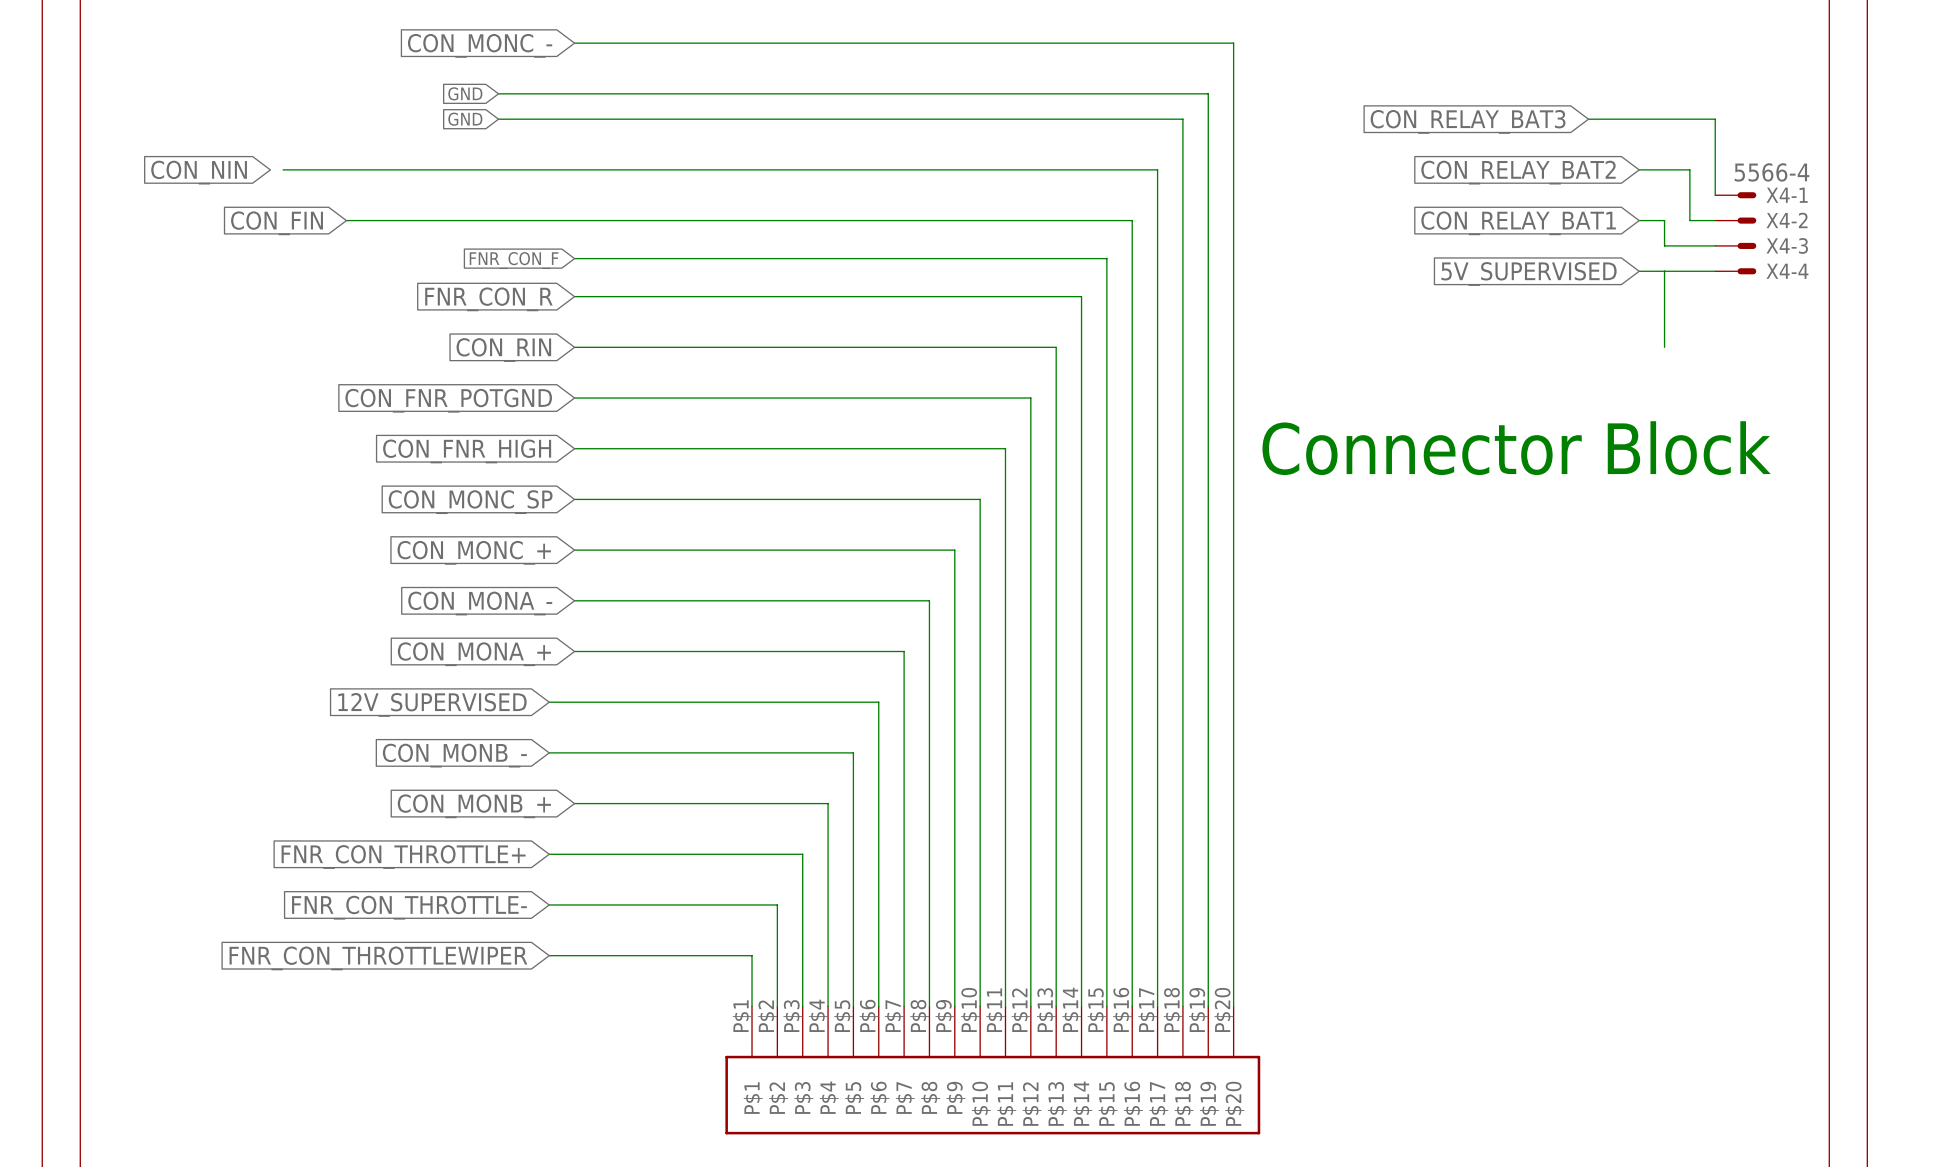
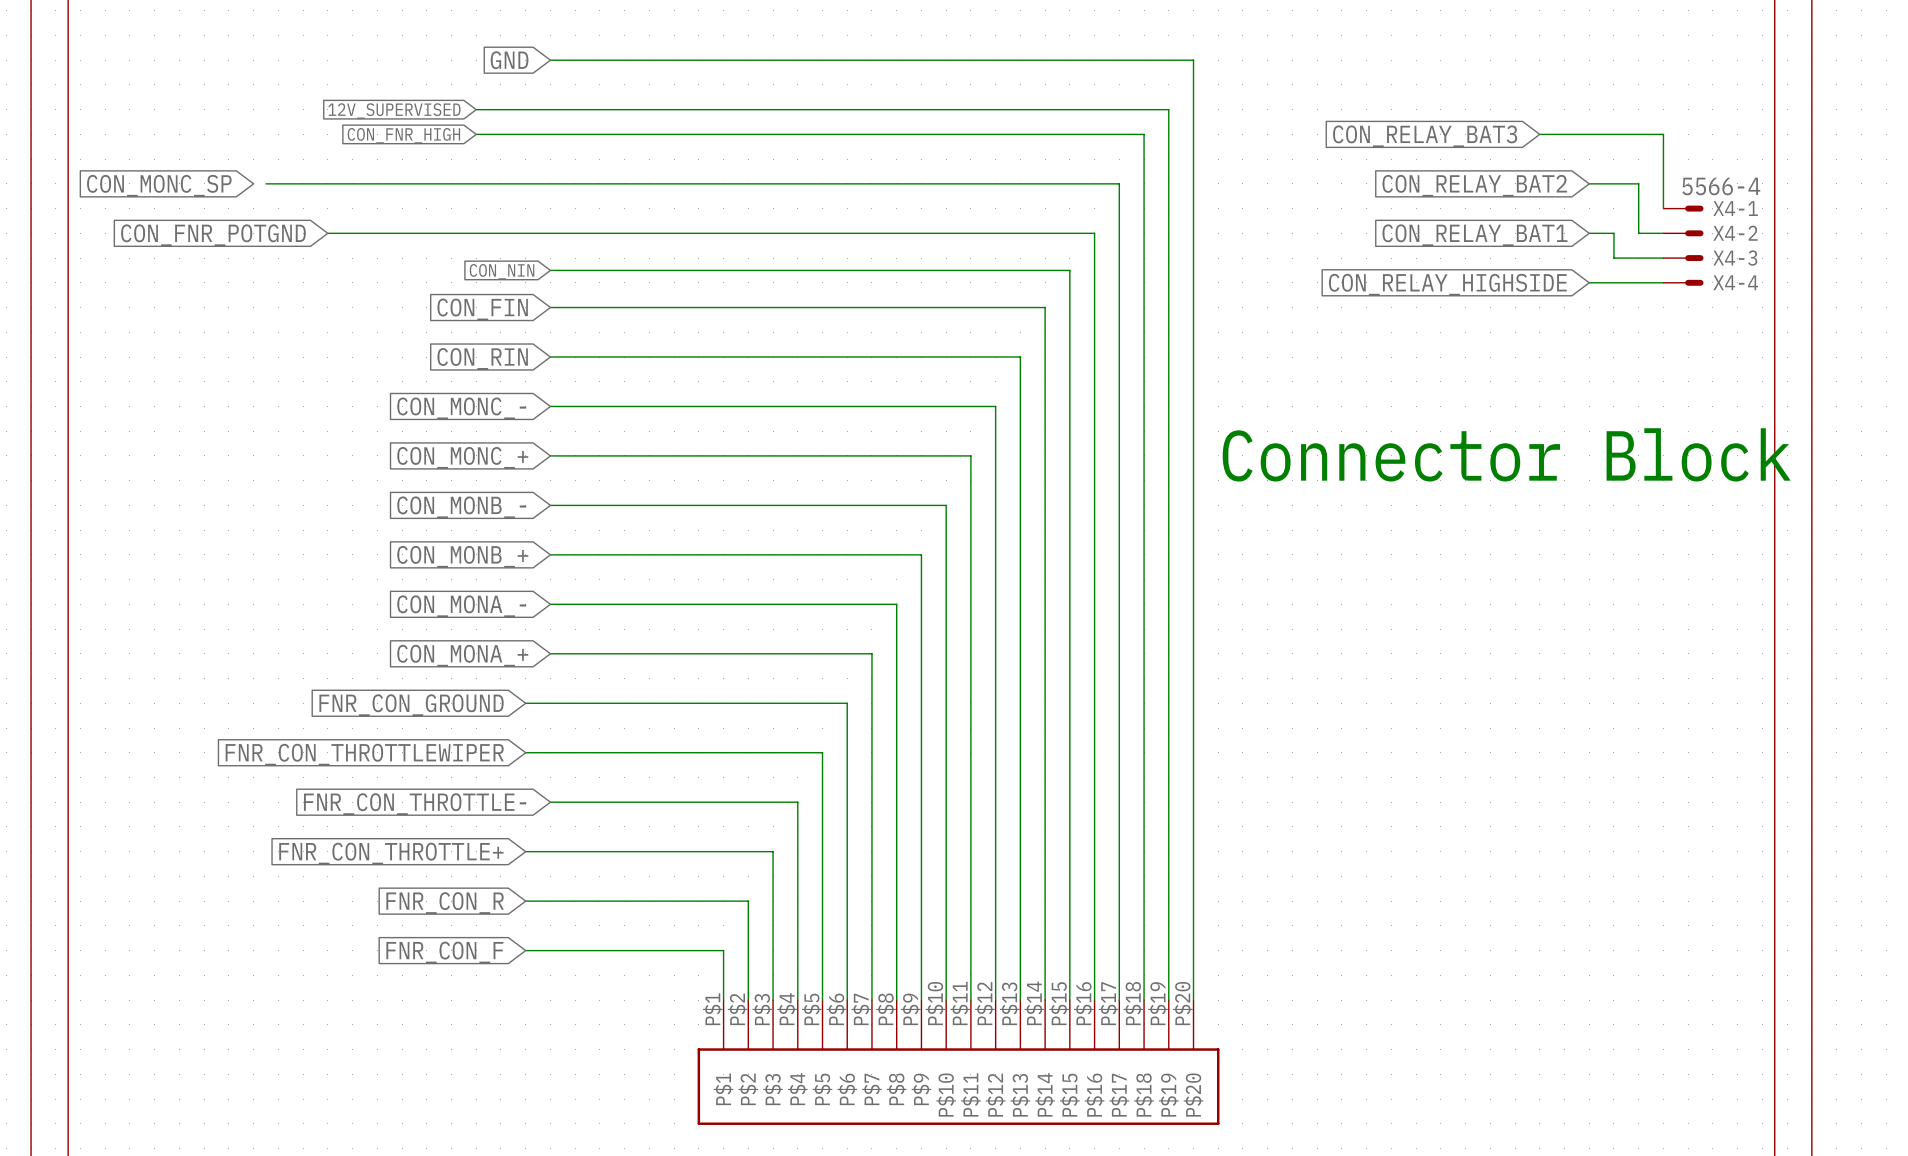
global label: CON_MONC_- (480, 45) -> GND (509, 60)
global label: GND (465, 93) -> 12V_SUPERVISED (394, 111)
global label: GND (465, 119) -> CON_FNR_HIGH (403, 135)
global label: CON_NIN (199, 172) -> CON_MONC_SP (159, 185)
global label: CON_FIN (277, 223) -> CON_FNR_POTGND (213, 235)
global label: FNR_CON_F (514, 260) -> CON_NIN (502, 271)
wire: (1664, 271) (1664, 347) -> none
global label: 5V_SUPERVISED (1529, 273) -> CON_RELAY_HIGHSIDE (1447, 284)
global label: FNR_CON_R (488, 299) -> CON_FIN (482, 309)
global label: CON_FNR_POTGND (448, 400) -> CON_MONC_- (461, 408)
global label: CON_FNR_HIGH (467, 451) -> CON_MONC_+ (462, 457)
global label: CON_MONC_SP (470, 502) -> CON_MONB_- (461, 507)
global label: CON_MONC_+ (474, 552) -> CON_MONB_+ (462, 556)
global label: 12V_SUPERVISED (432, 704) -> FNR_CON_GROUND (411, 705)
global label: CON_MONB_- (454, 755) -> FNR_CON_THROTTLEWIPER (364, 754)
global label: CON_MONB_+ (474, 806) -> FNR_CON_THROTTLE- (415, 804)
global label: FNR_CON_THROTTLE- (409, 907) -> FNR_CON_R (445, 903)
global label: FNR_CON_THROTTLEWIPER (378, 958) -> FNR_CON_F (444, 952)

